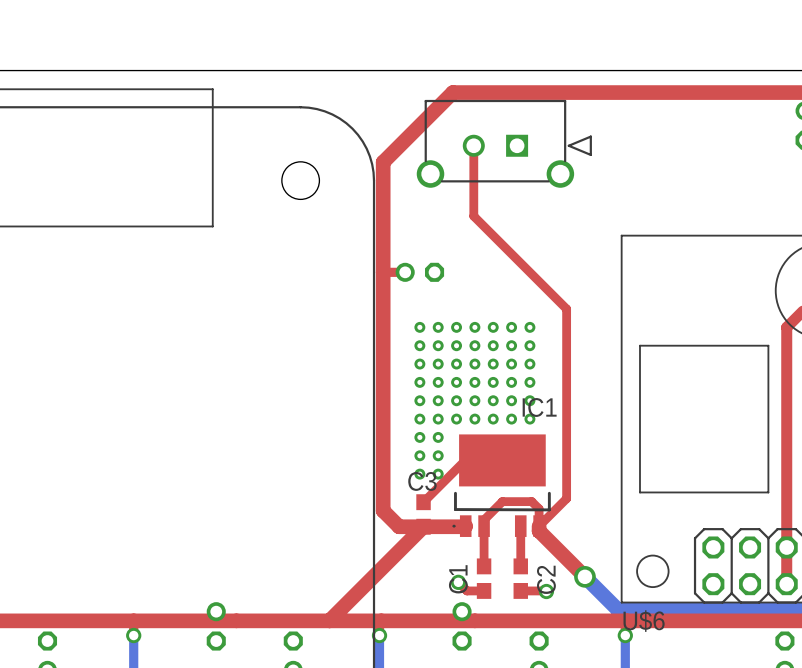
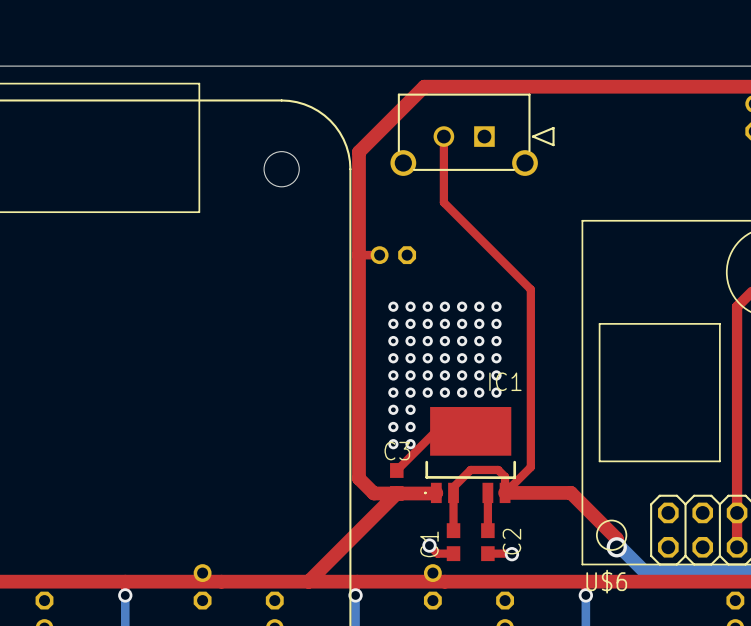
top track: (539, 526) (539, 530) (584, 576) -> (505, 492) (571, 492) (616, 538) (616, 547)
bottom track: (584, 576) (617, 609) (687, 609) -> (616, 547) (620, 547) (644, 571)
via position: (584, 576) -> (616, 547)

